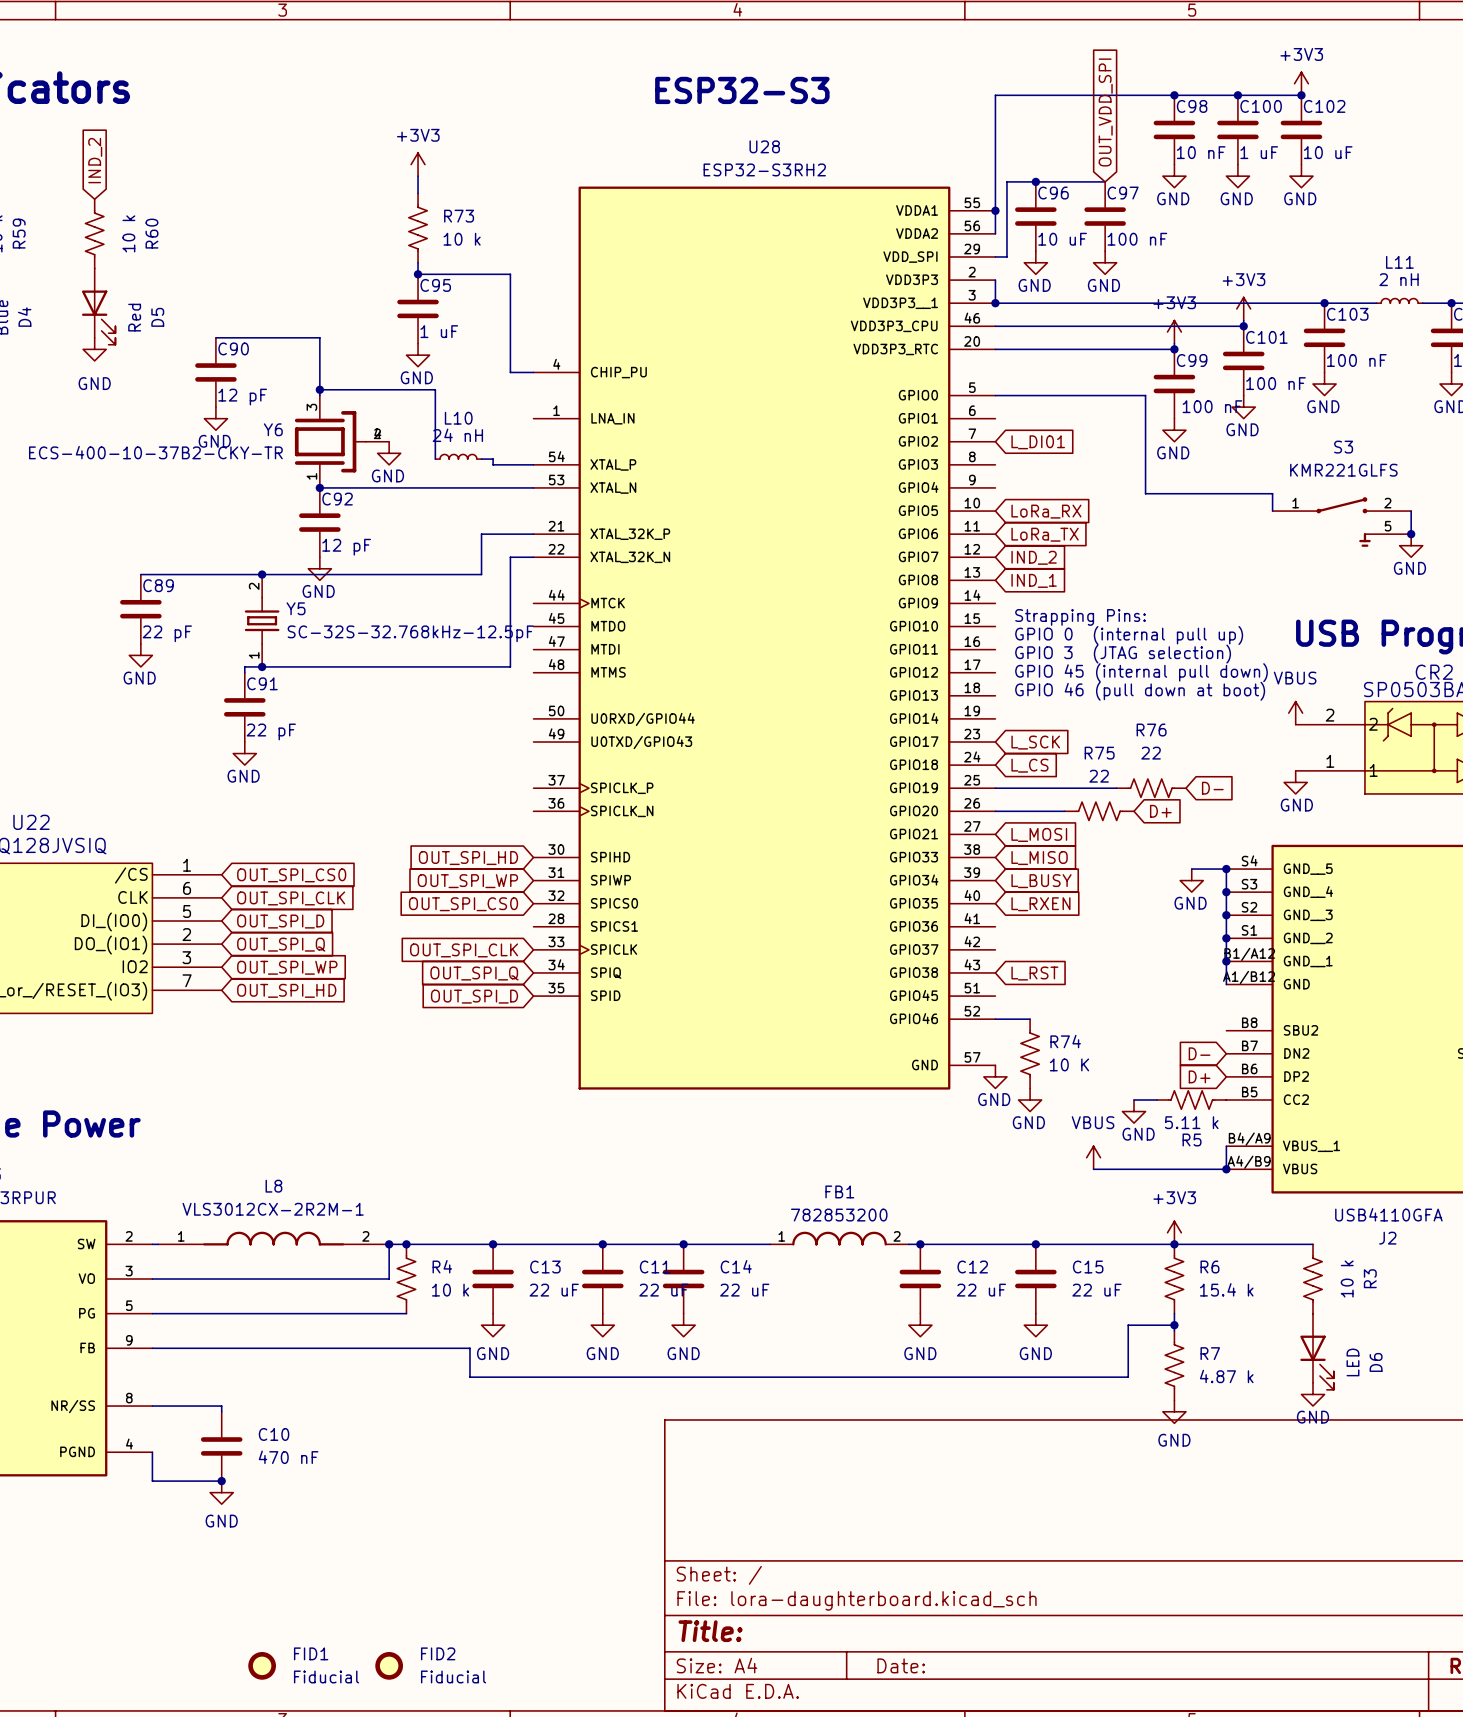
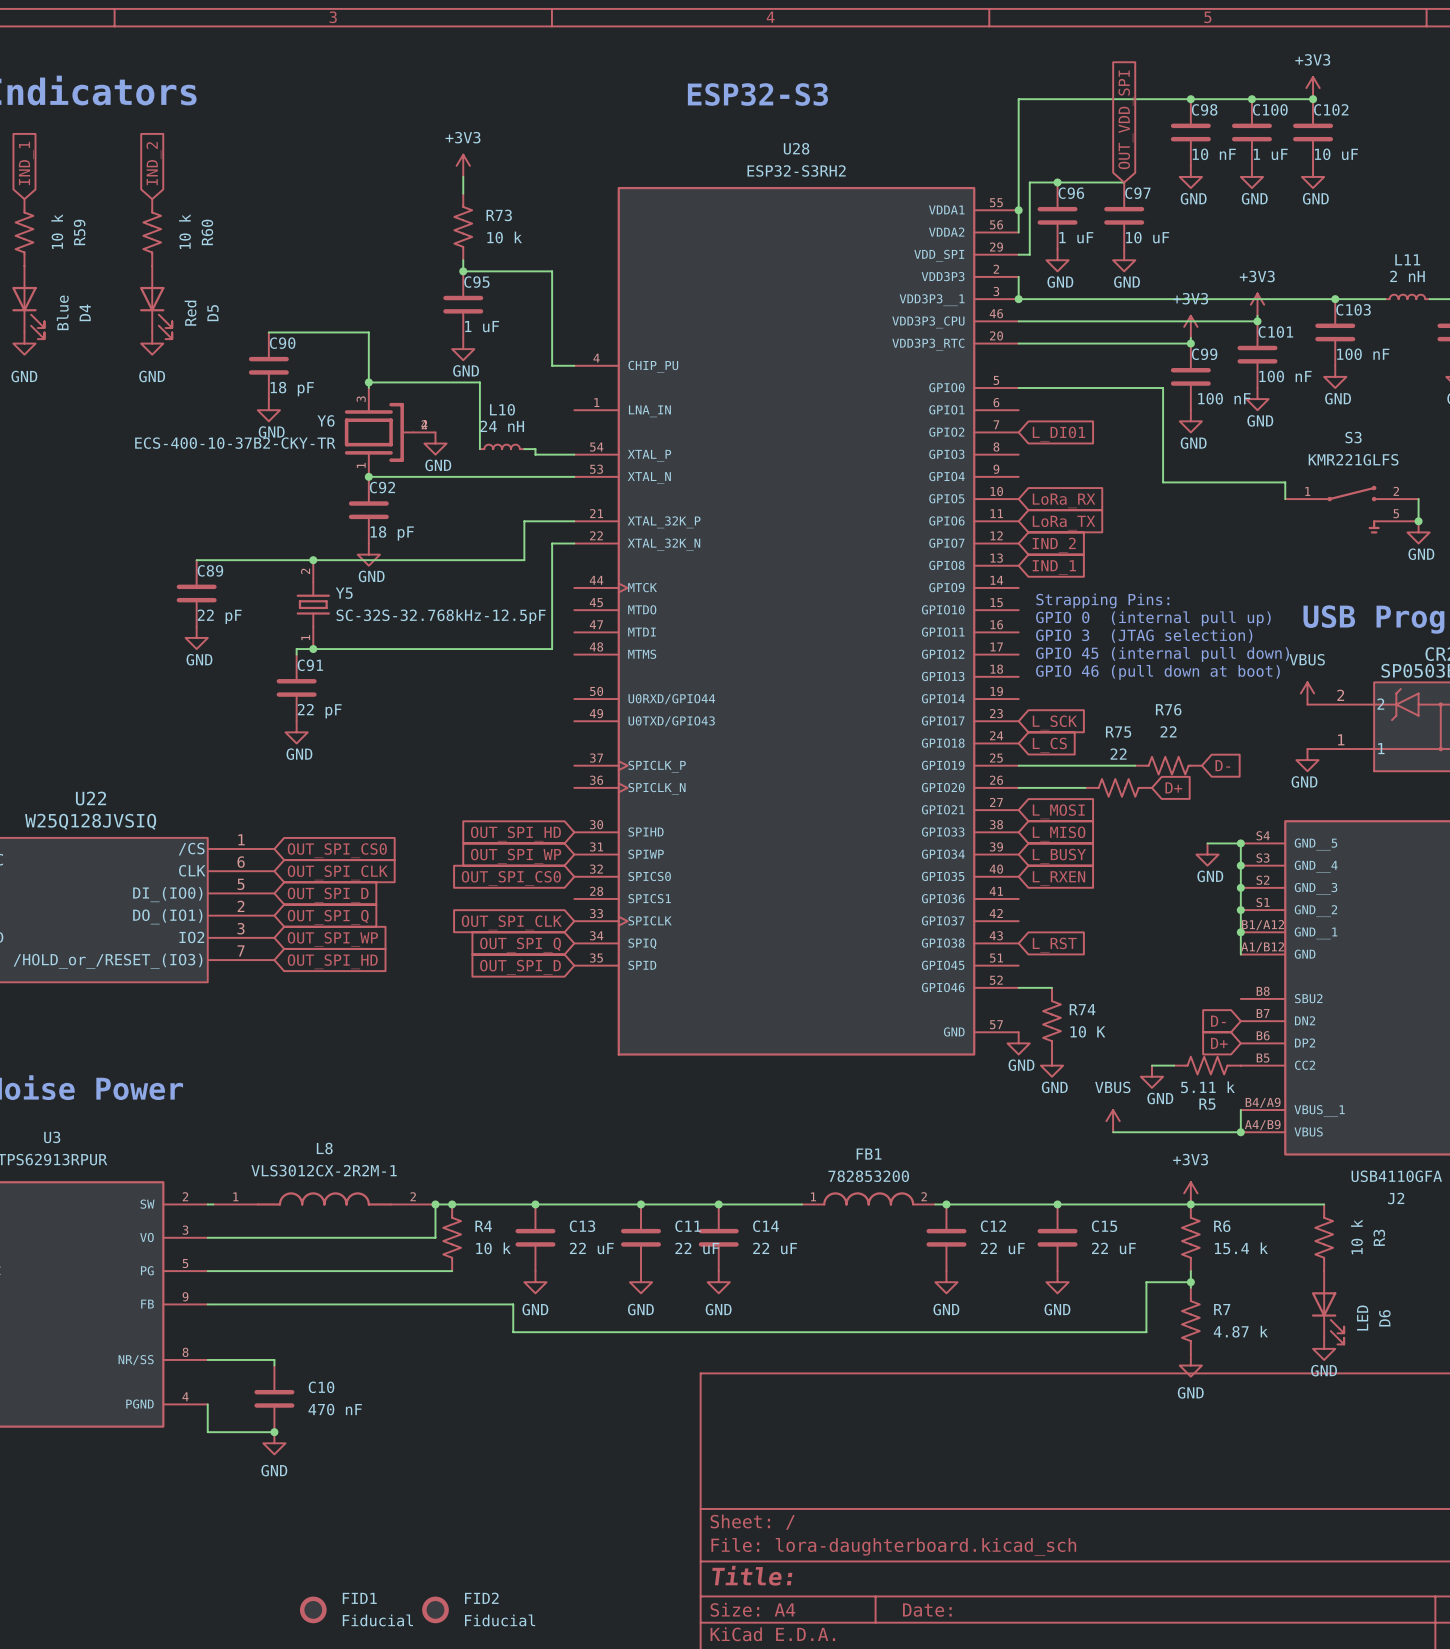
C96 value: 10 uF (1062, 239) -> 1 uF (1076, 237)
C97 value: 100 nF (1137, 239) -> 10 uF (1147, 237)
C90 value: 12 pF (242, 397) -> 18 pF (292, 389)
C92 value: 12 pF (346, 547) -> 18 pF (392, 533)

